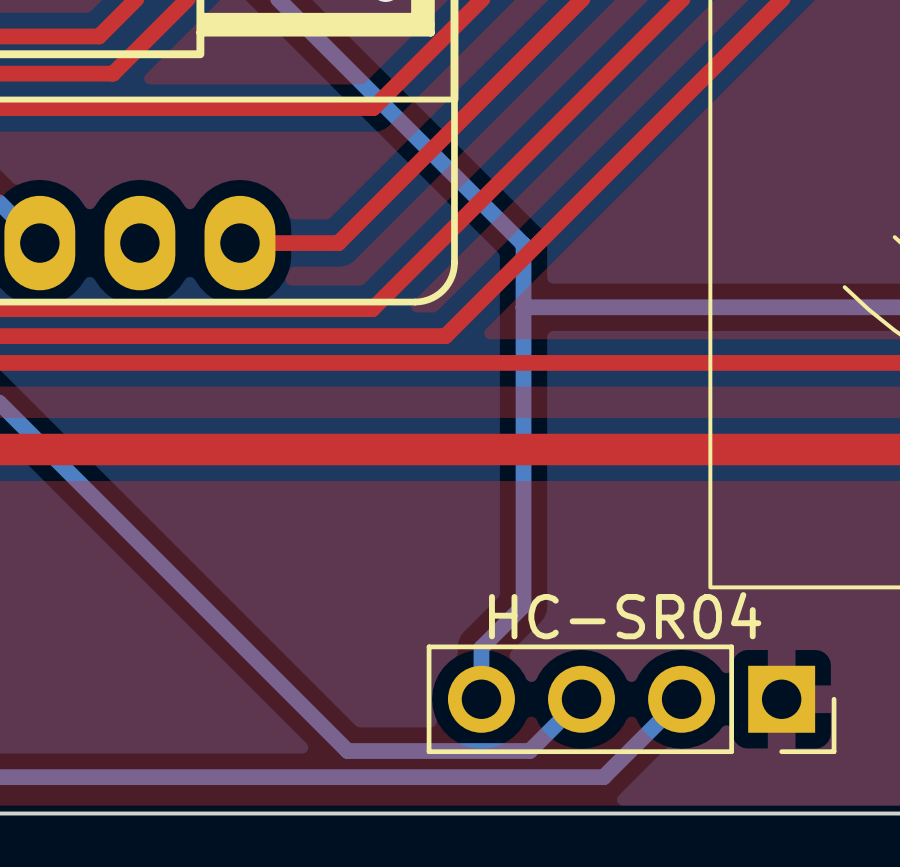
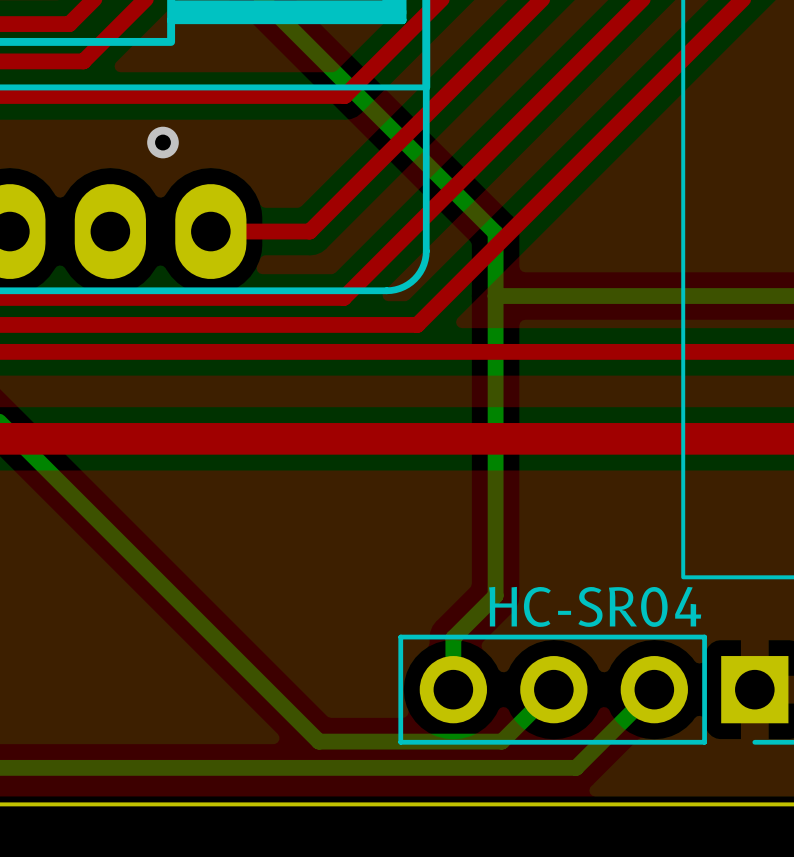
via: none -> (162, 142)

